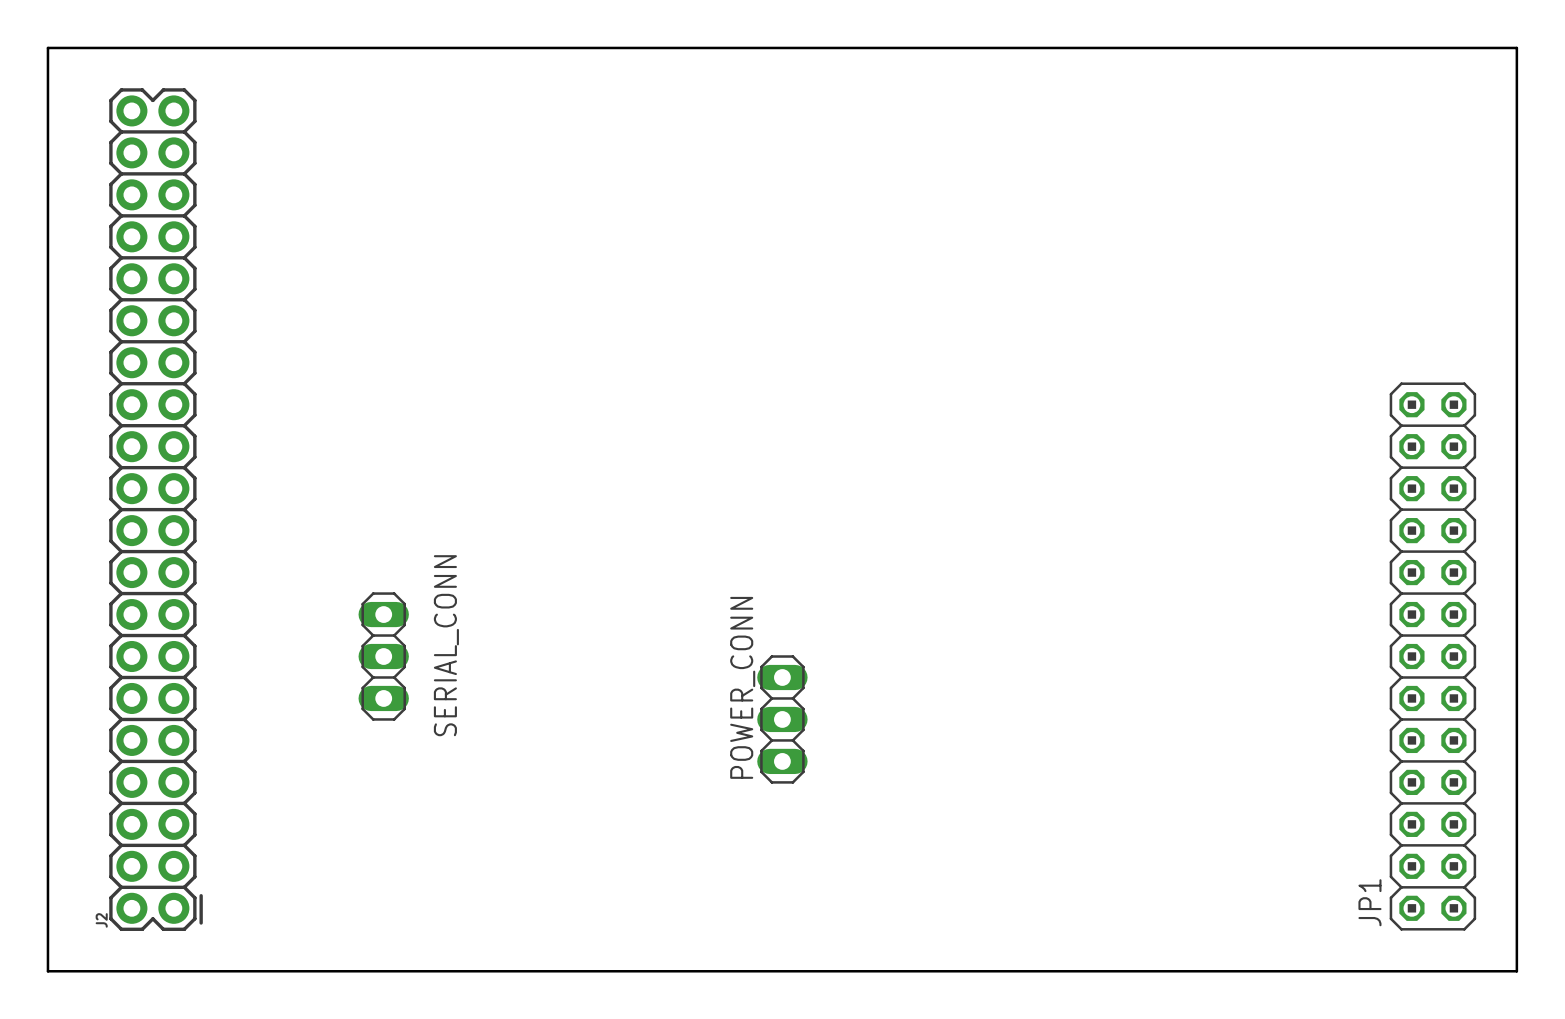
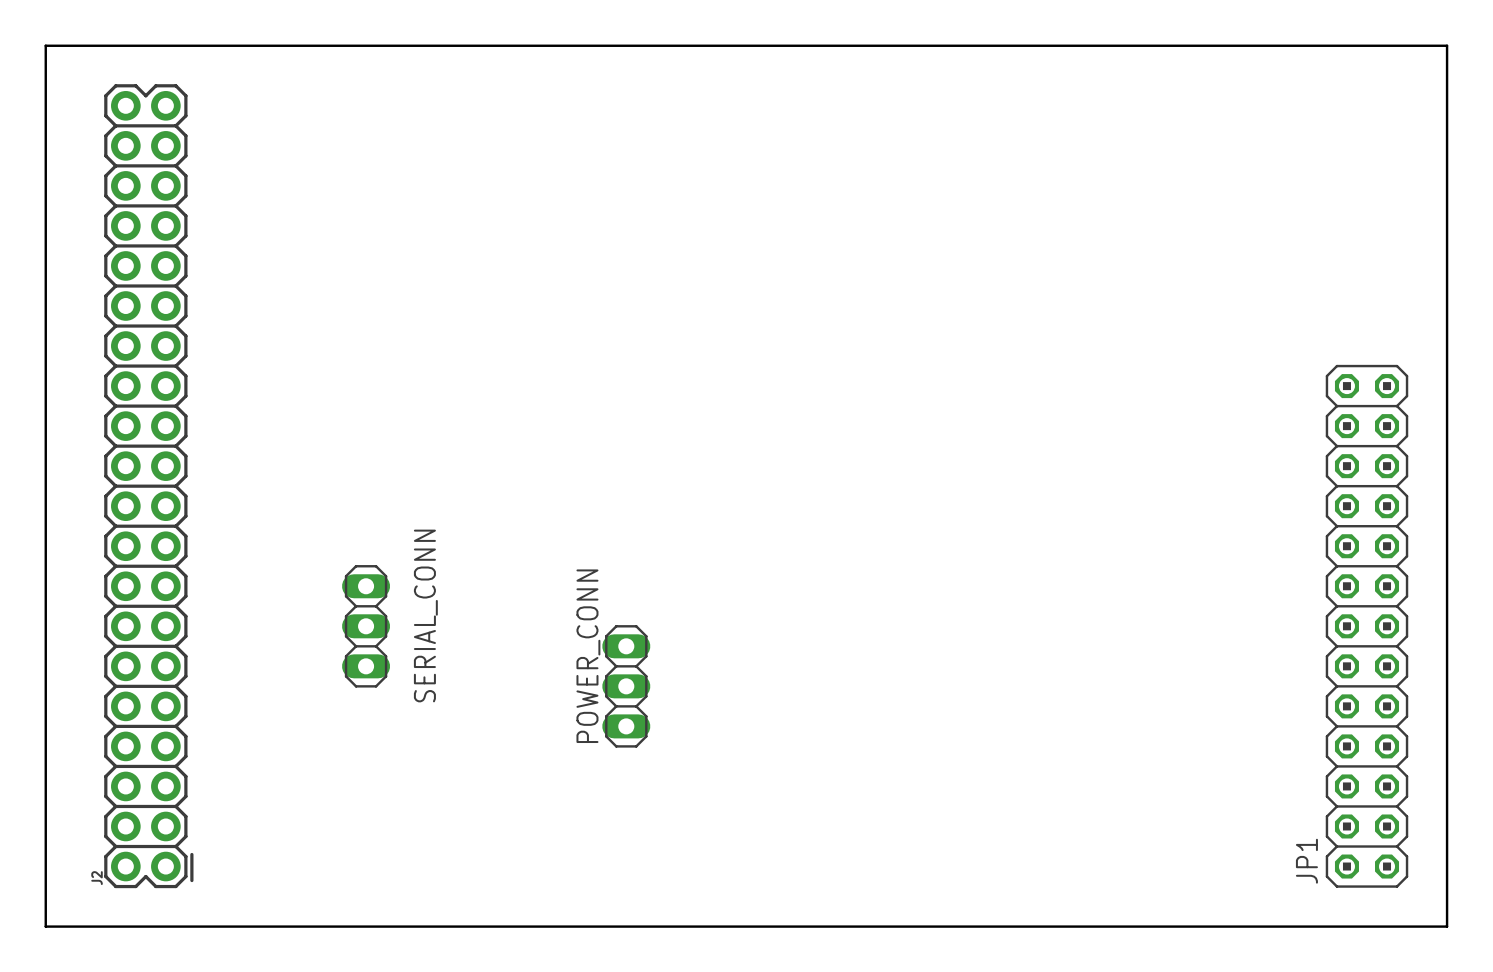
POWER_CONN position: (782, 719) -> (626, 686)

